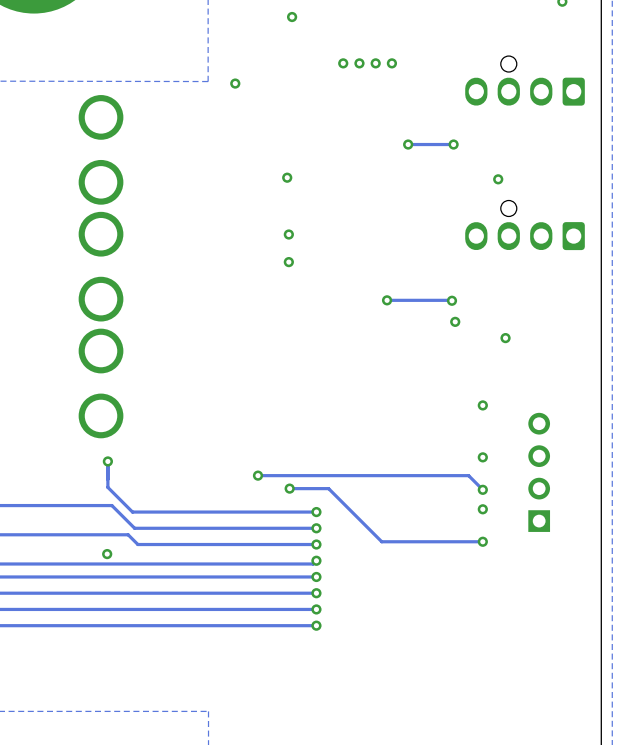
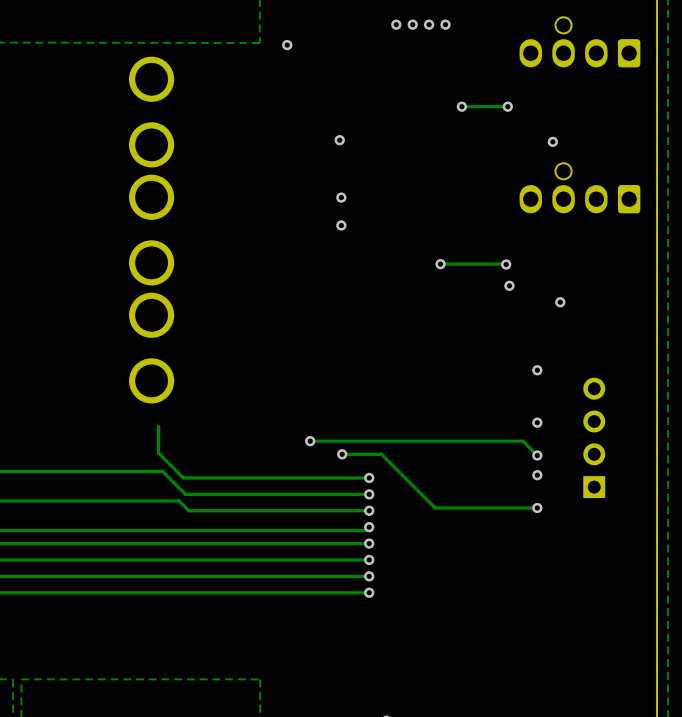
via: (107, 461) -> none
via: (107, 554) -> none

